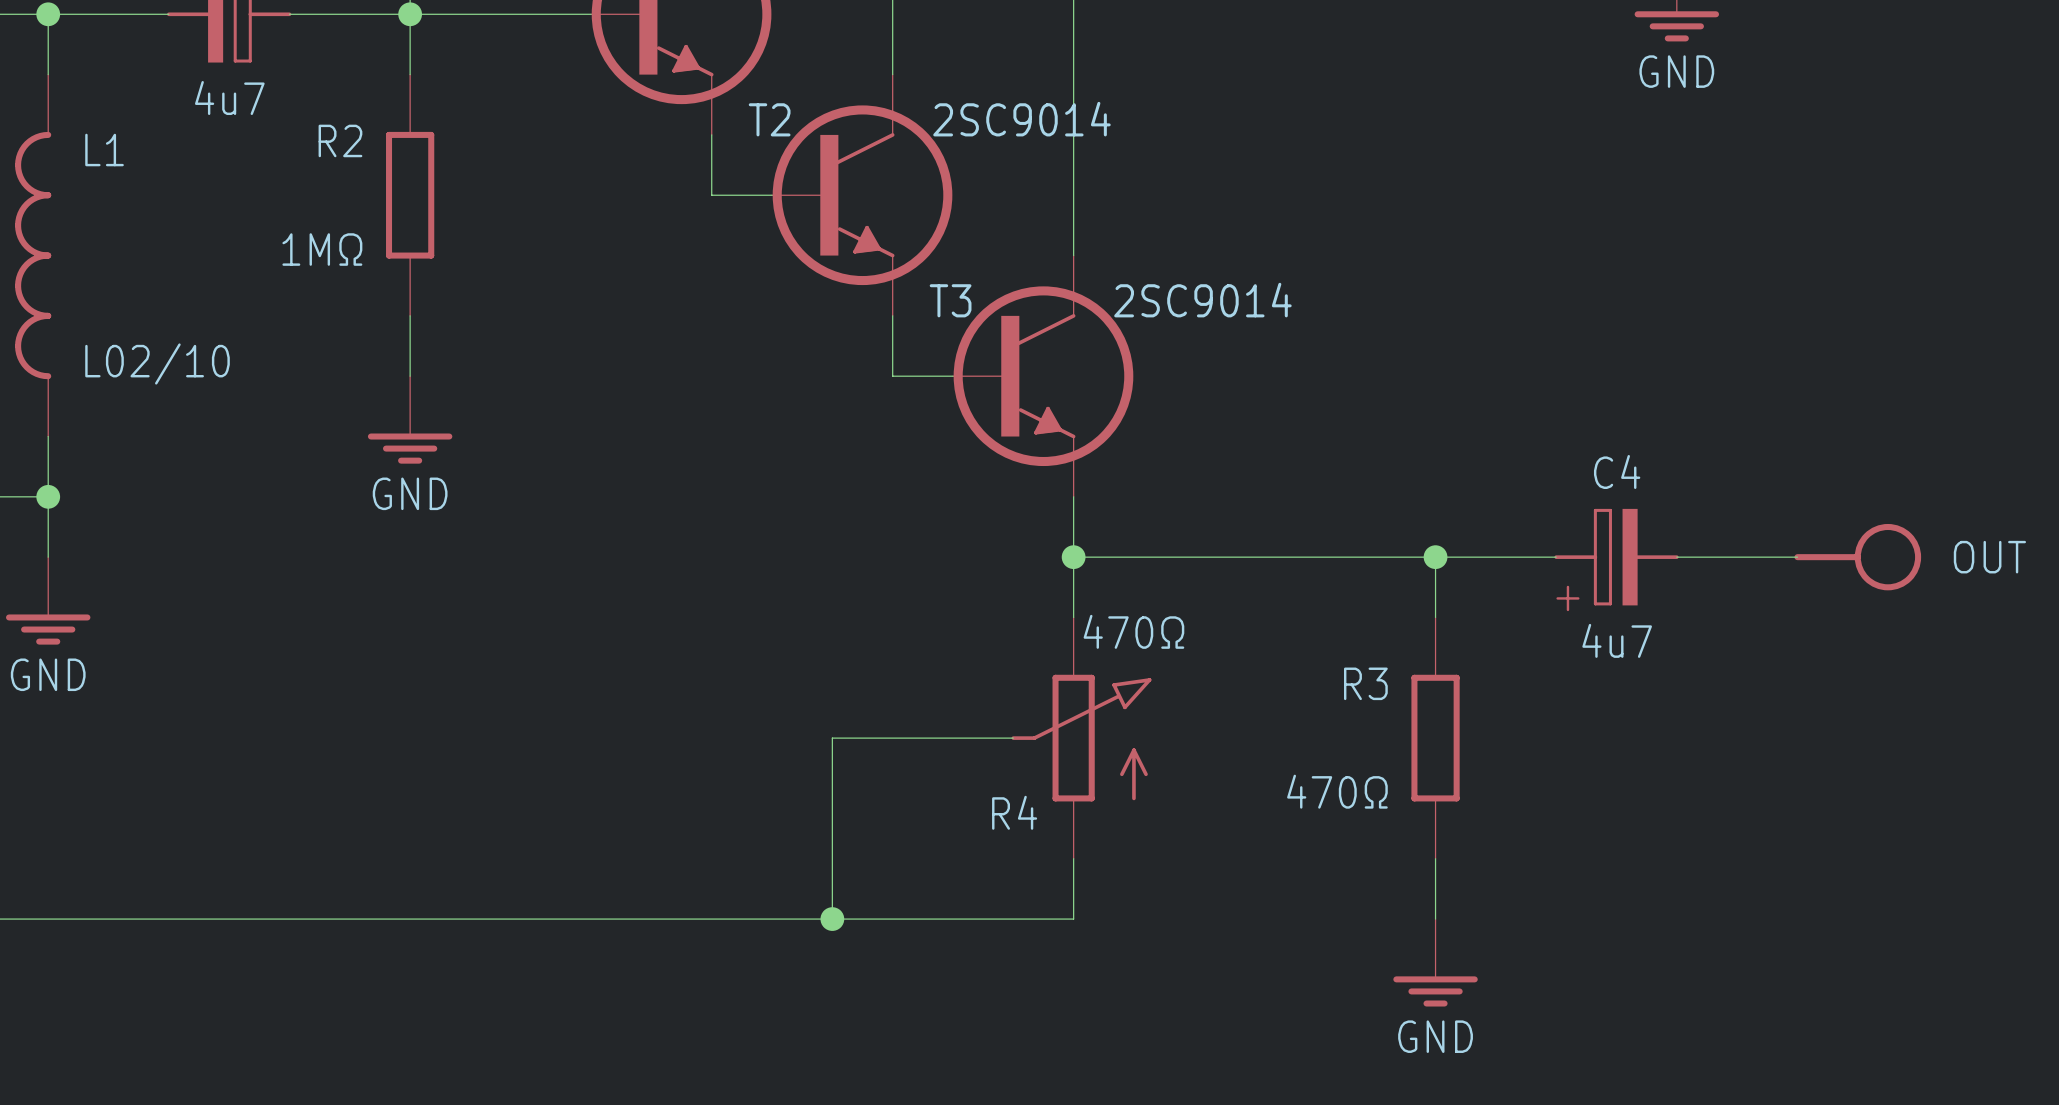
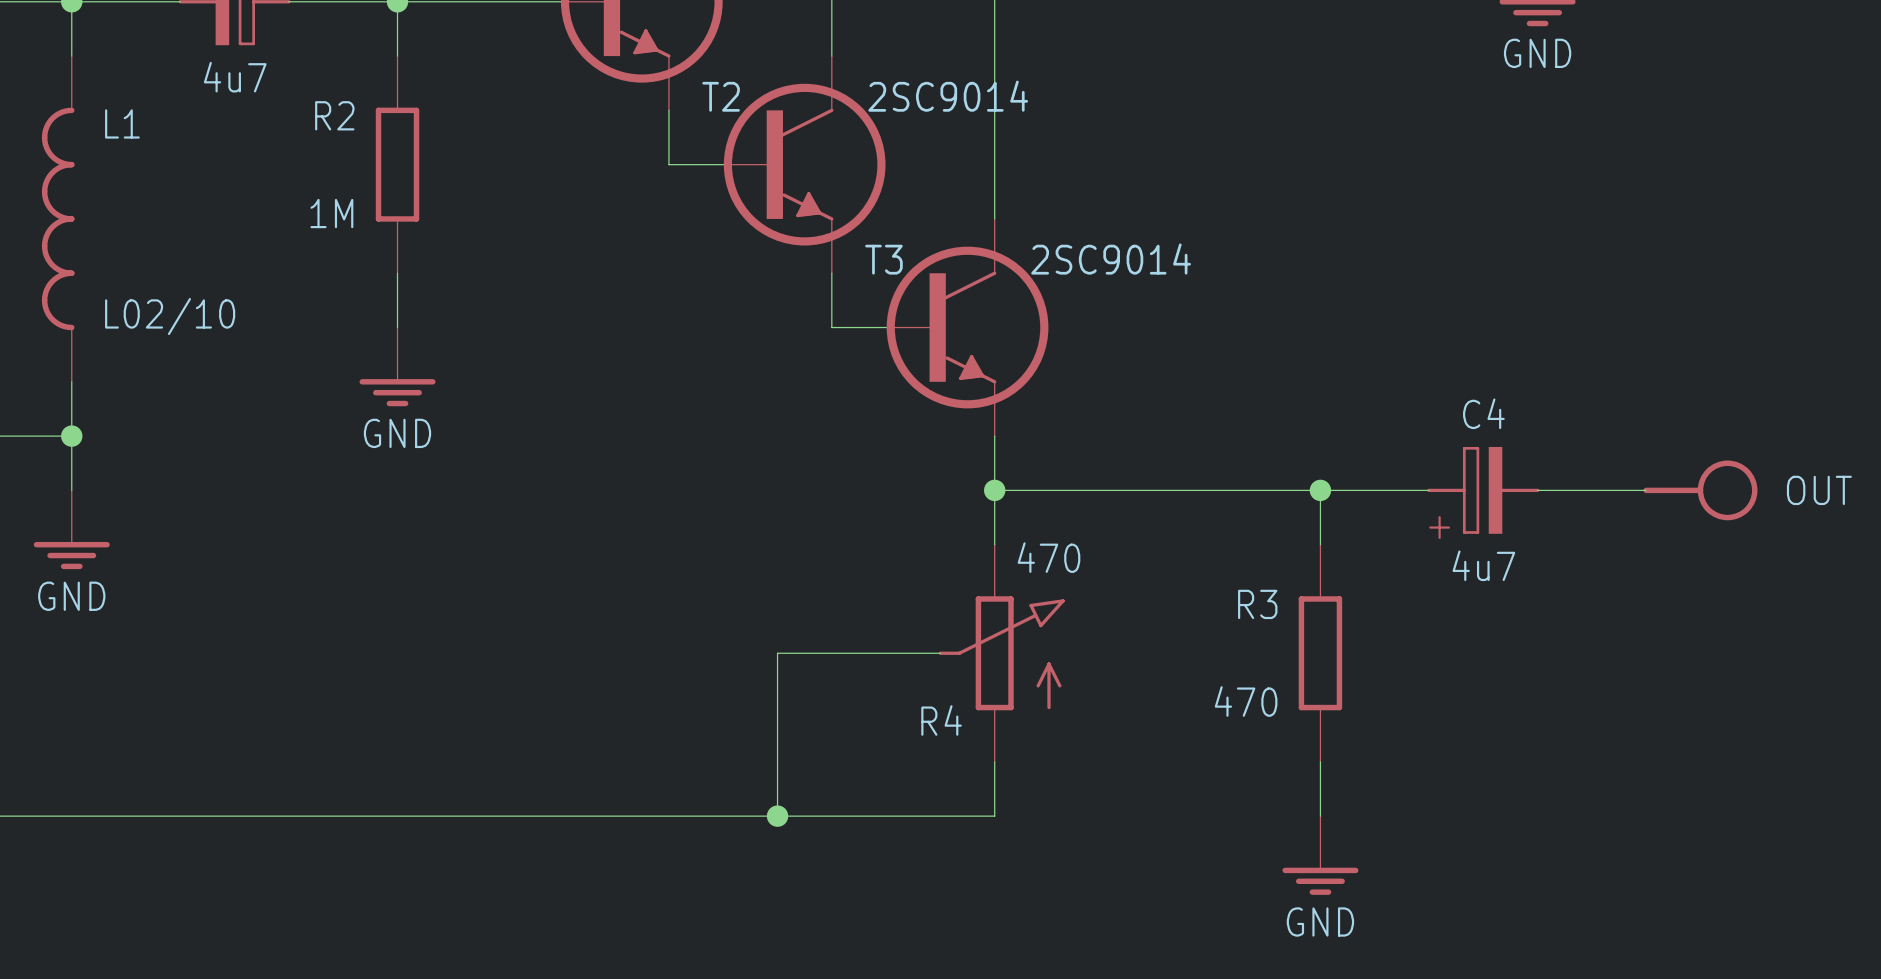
R2 value: 1MΩ (322, 249) -> 1M (331, 213)
R4 value: 470Ω (1133, 631) -> 470 (1048, 557)
R3 value: 470Ω (1337, 791) -> 470 (1246, 701)

